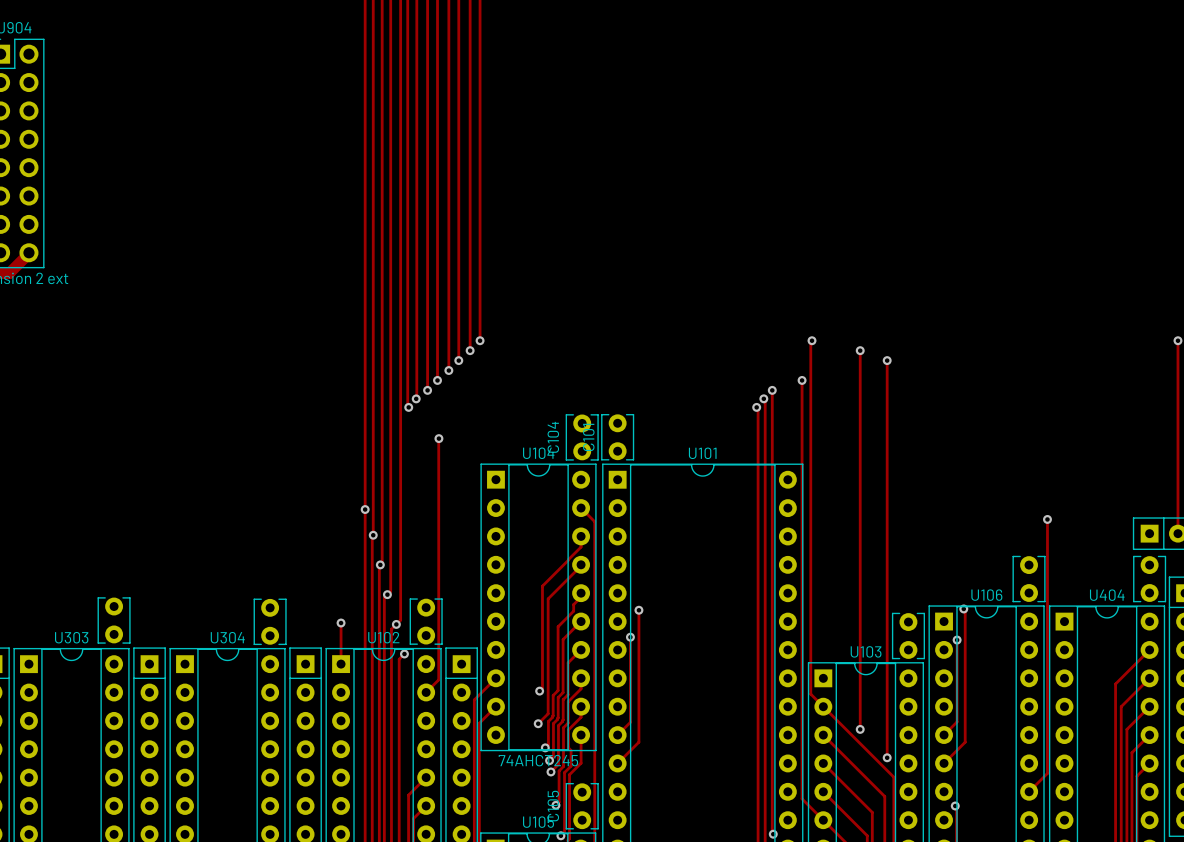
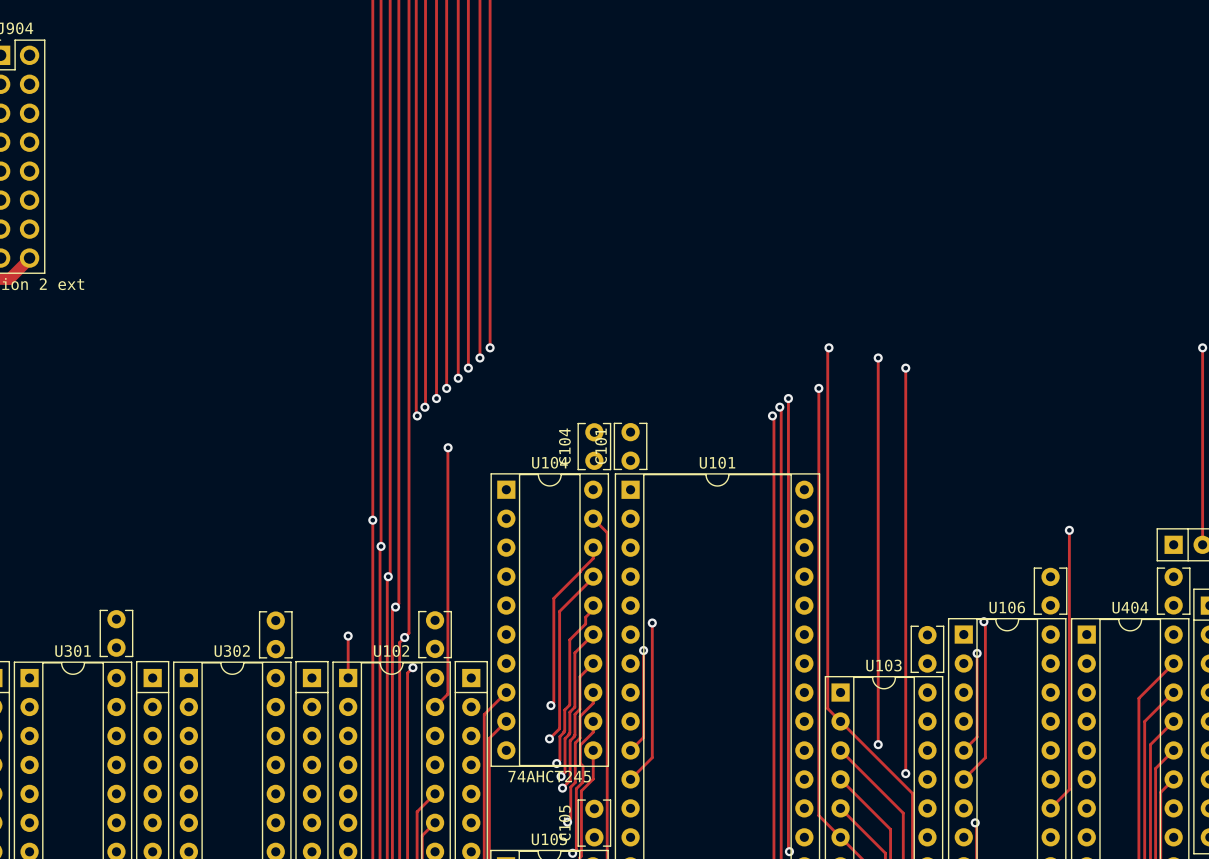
U303 name: U303 (71, 637) -> U301 (73, 651)
U304 name: U304 (227, 637) -> U302 (232, 651)

